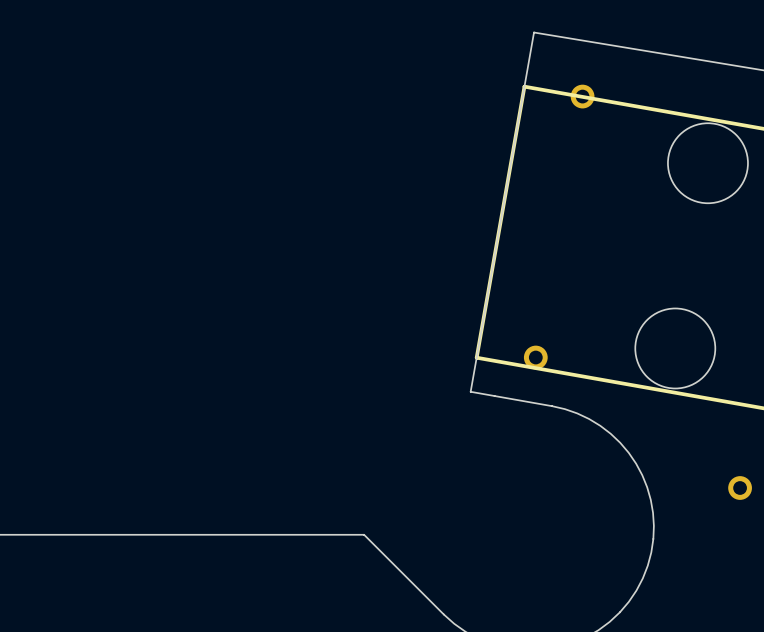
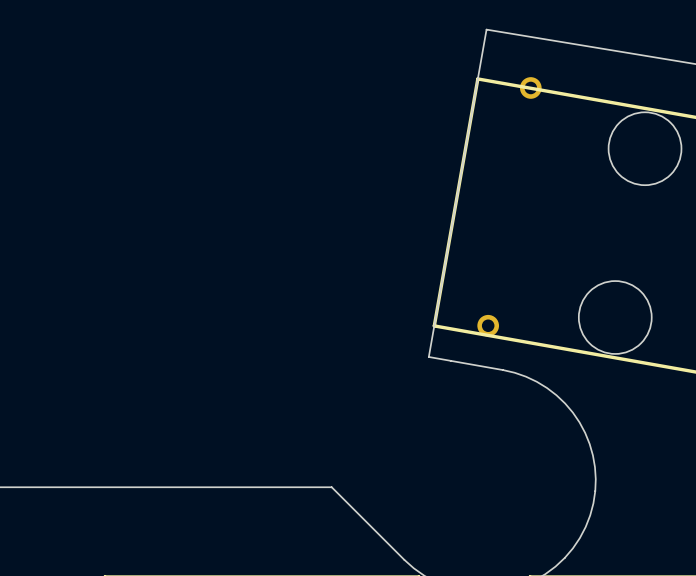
part: (740, 488) -> none

